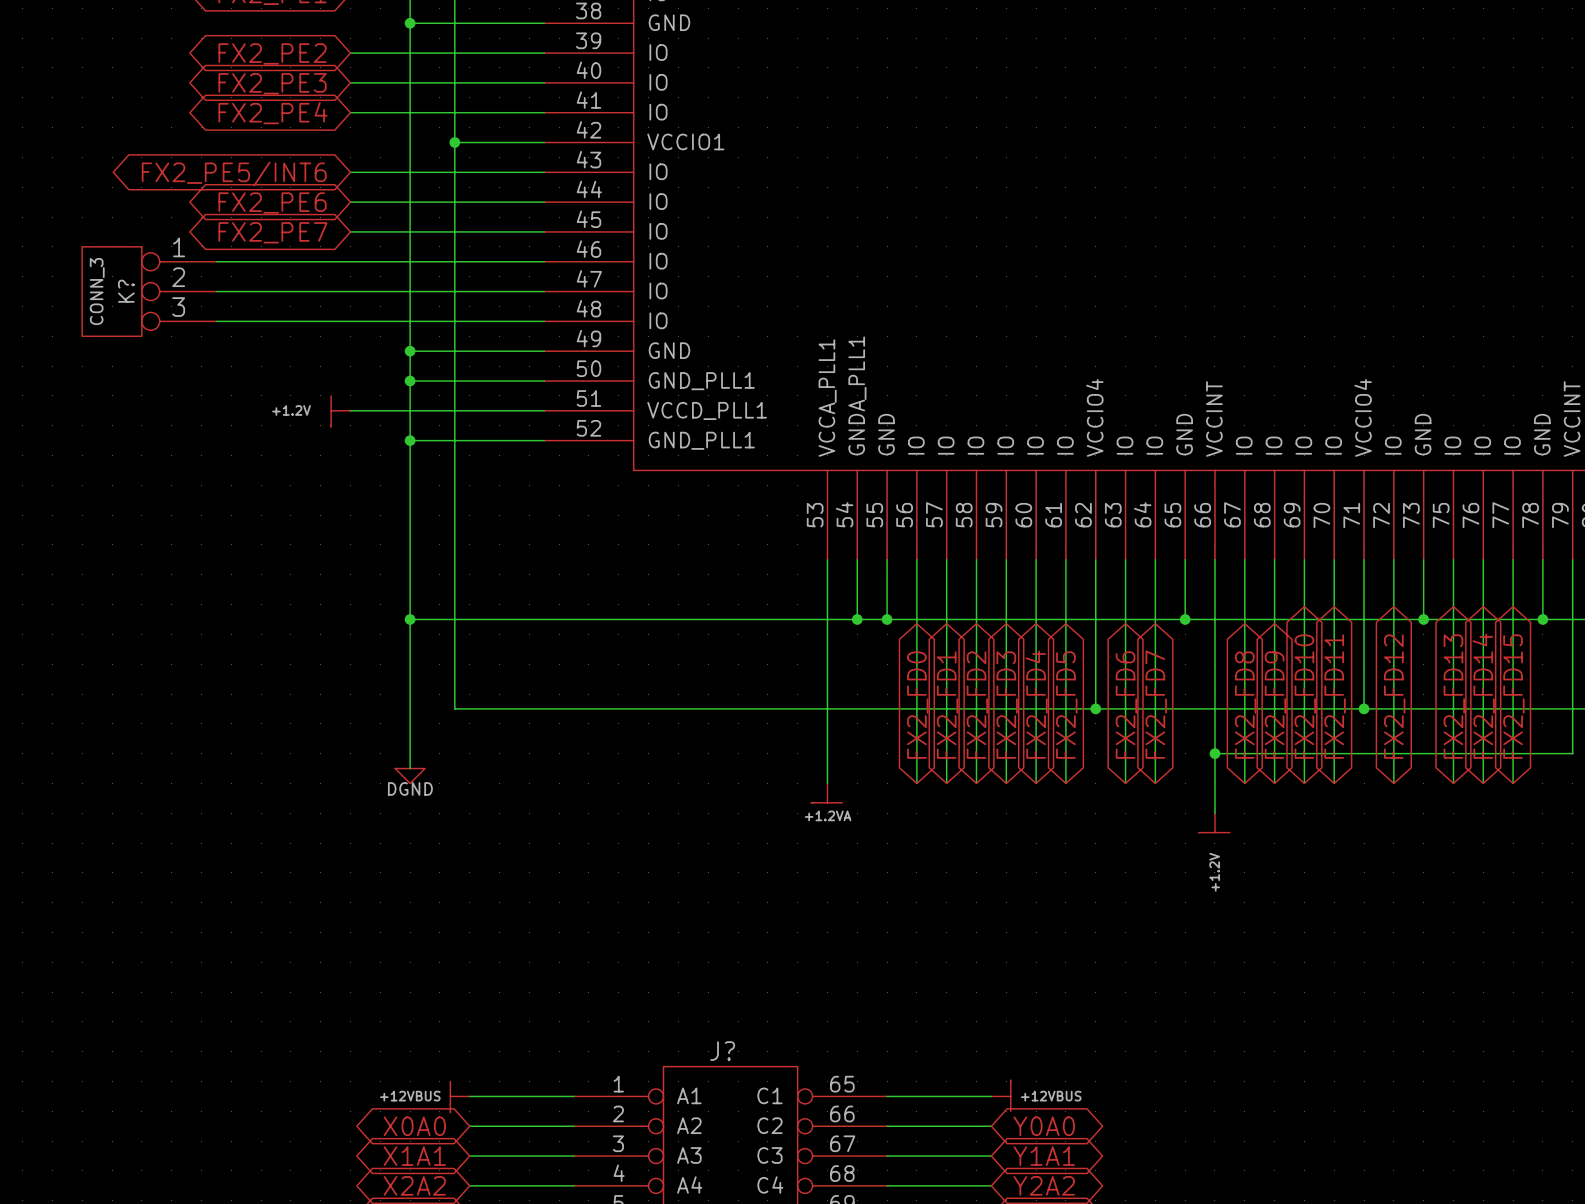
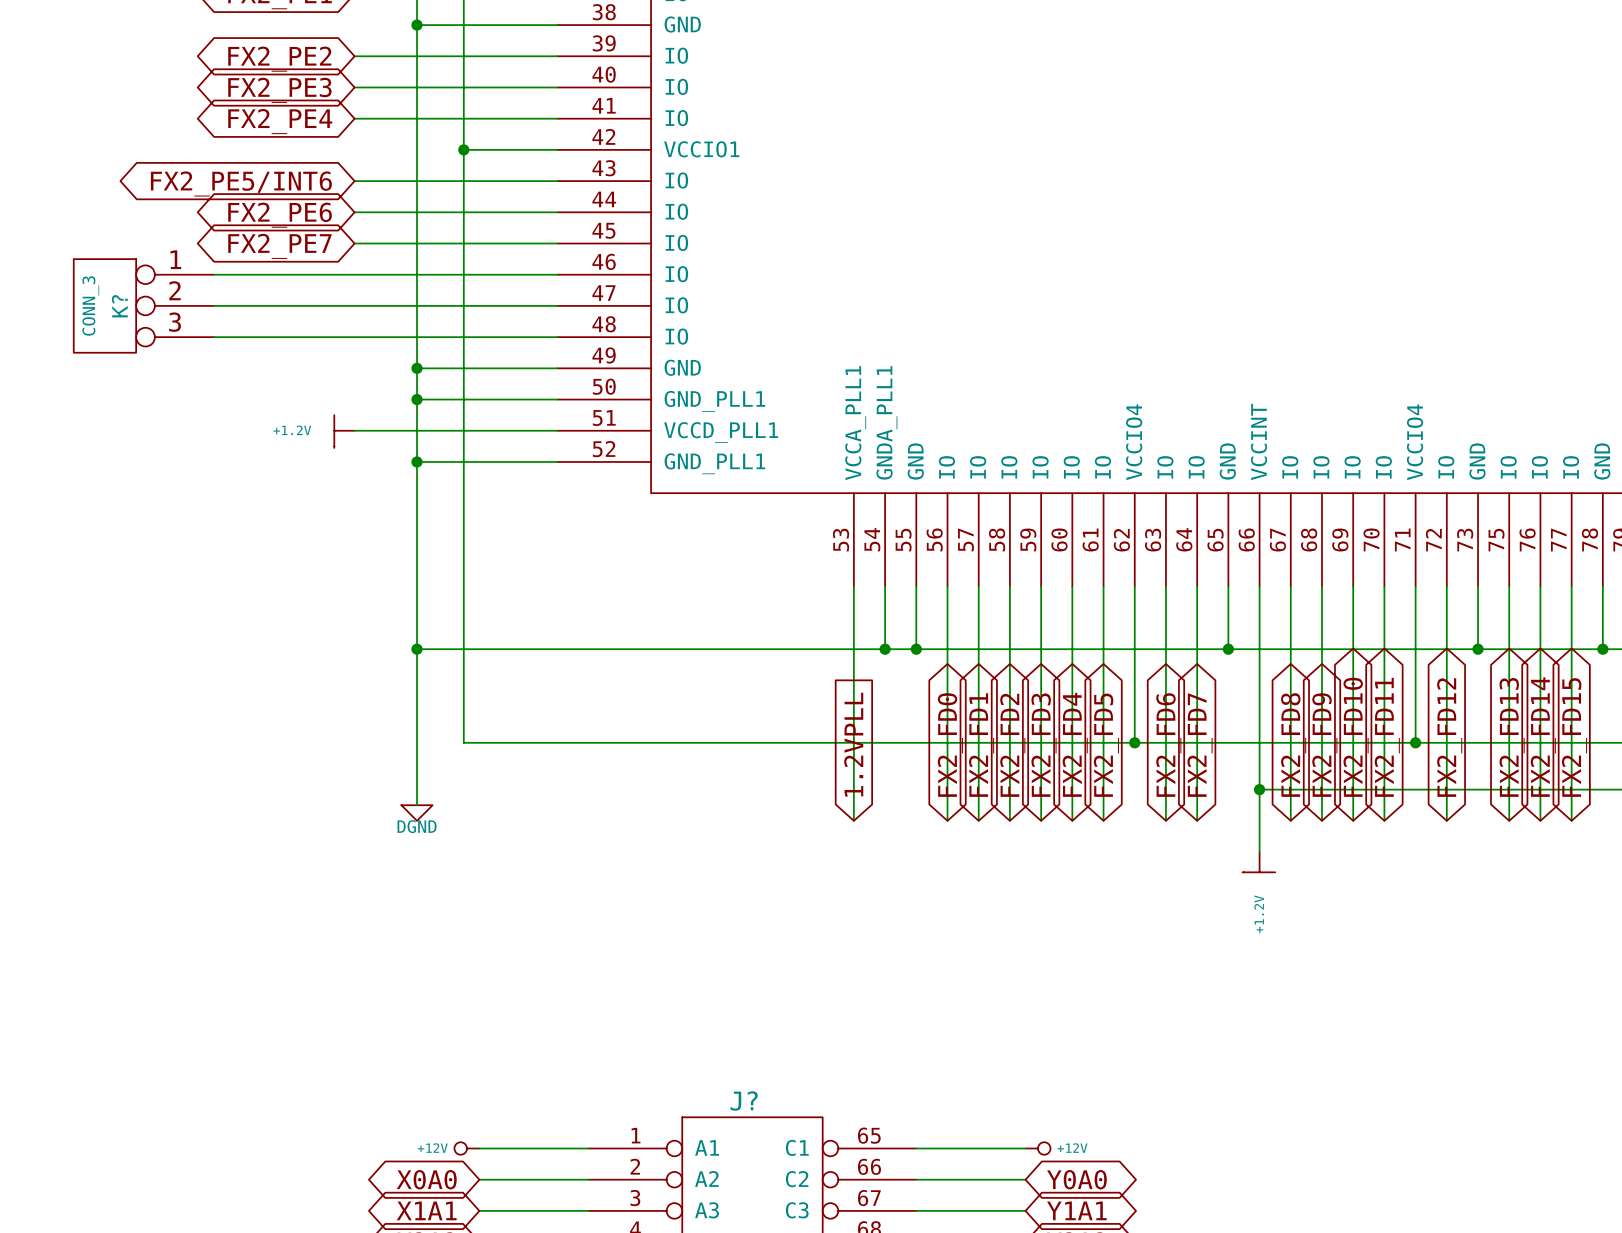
global label: none -> 1.2VPLL (853, 744)
power symbol: +1.2VA (826, 793) -> none
power symbol: +12VBUS (1001, 1095) -> +12V (1038, 1148)
power symbol: +12VBUS (460, 1097) -> +12V (466, 1148)

